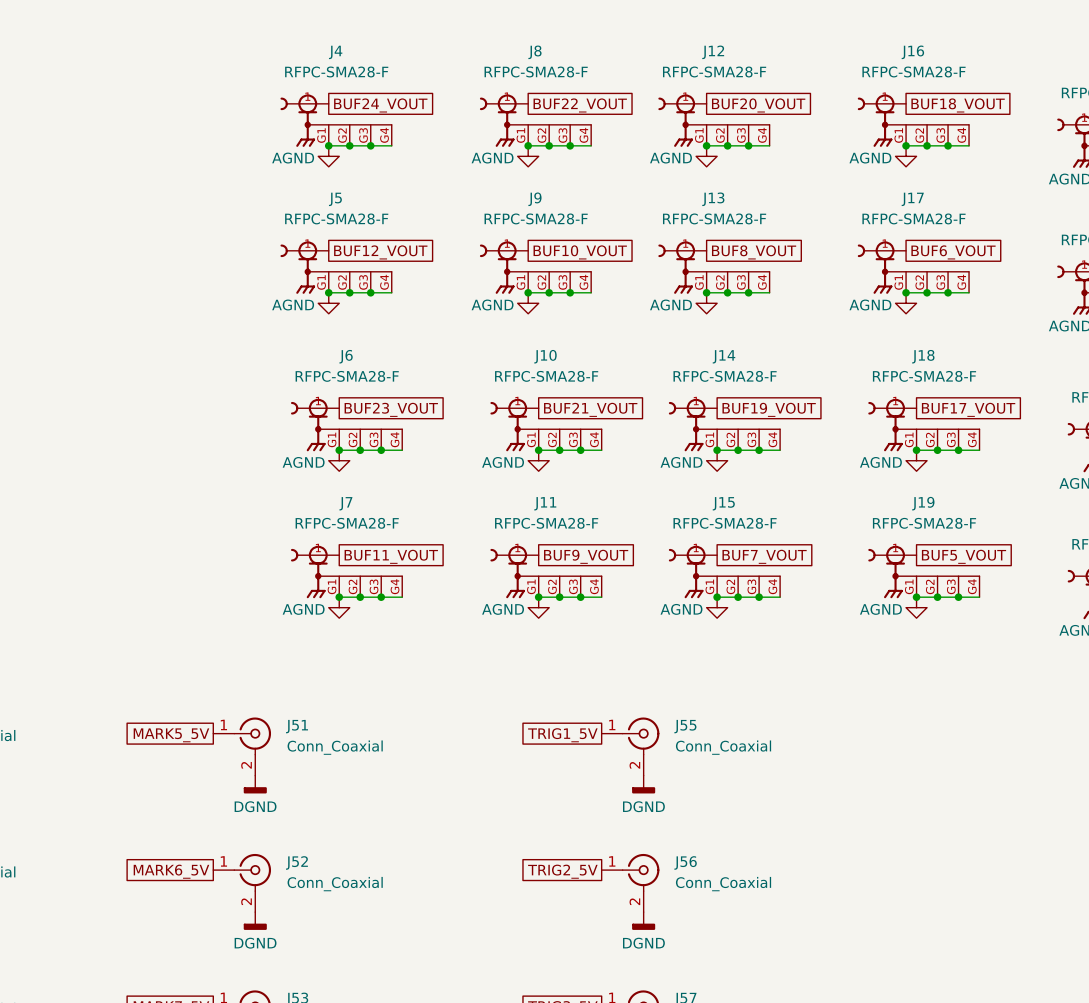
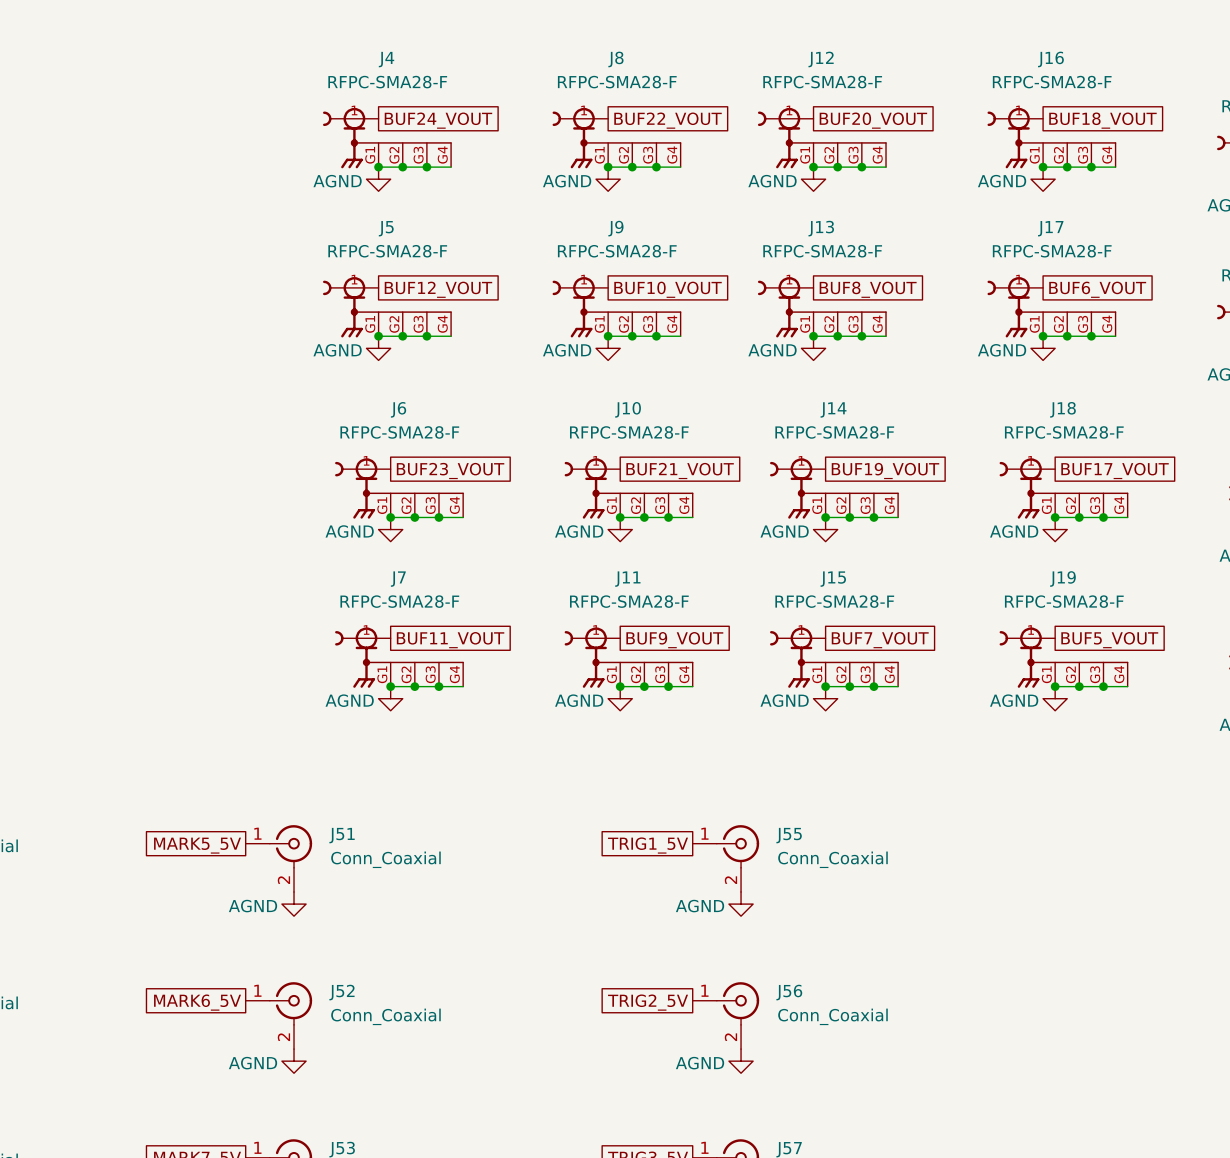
power symbol: DGND (255, 784) -> AGND (294, 904)
power symbol: DGND (643, 784) -> AGND (741, 904)
power symbol: DGND (255, 920) -> AGND (294, 1061)
power symbol: DGND (643, 920) -> AGND (741, 1061)

